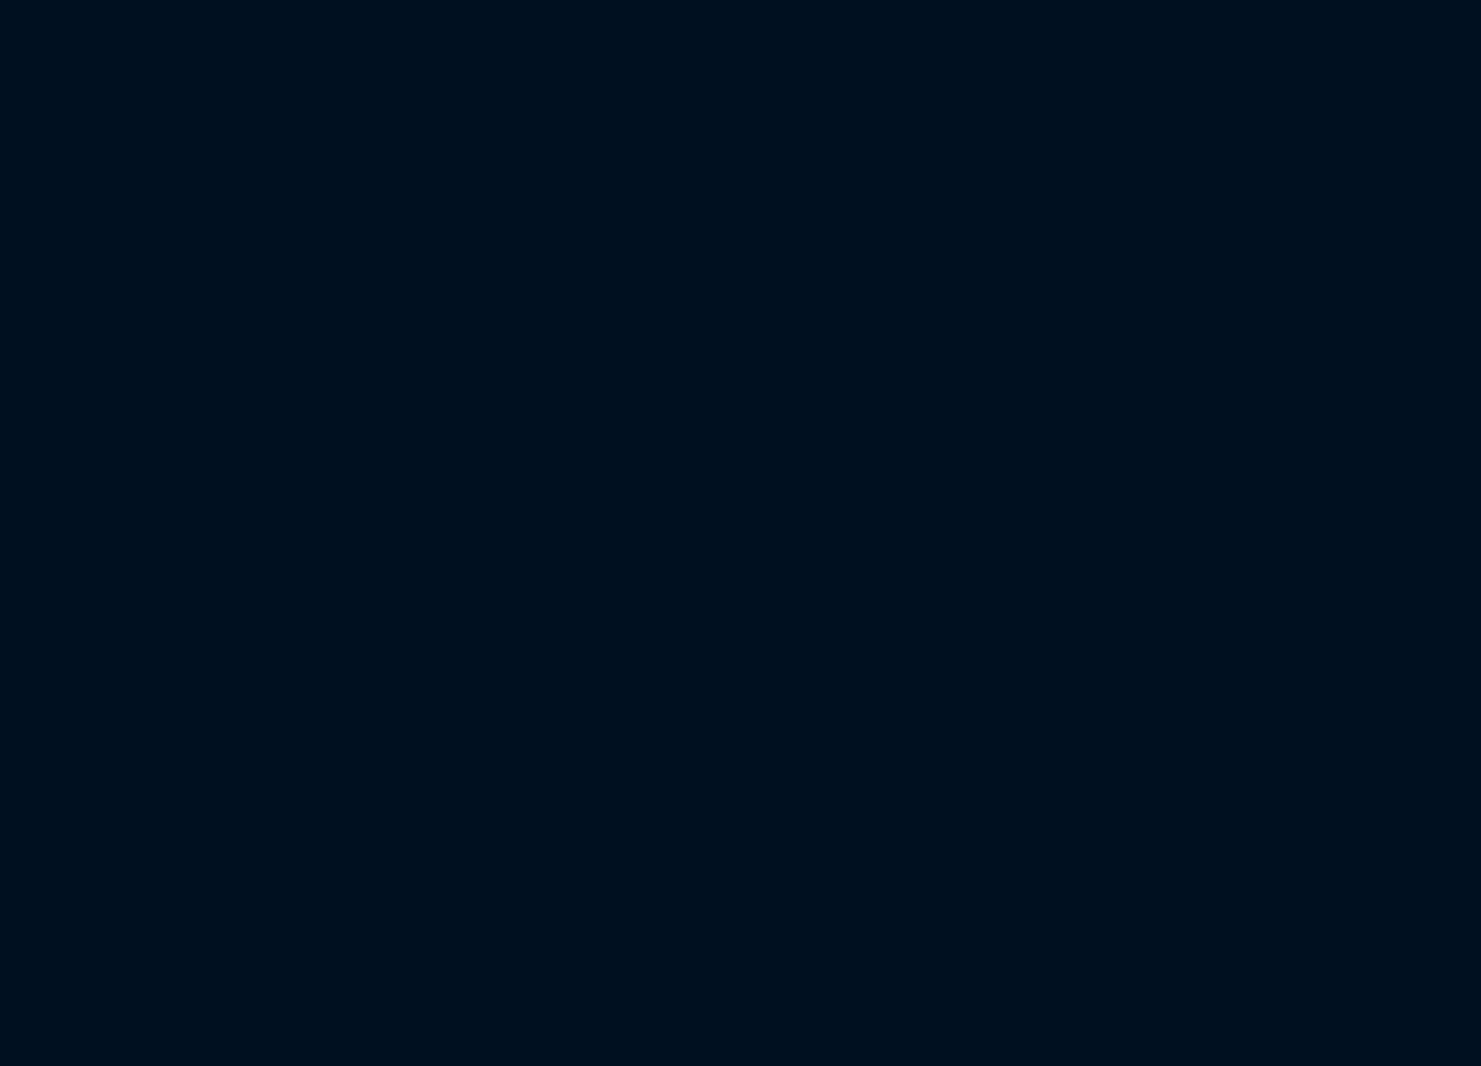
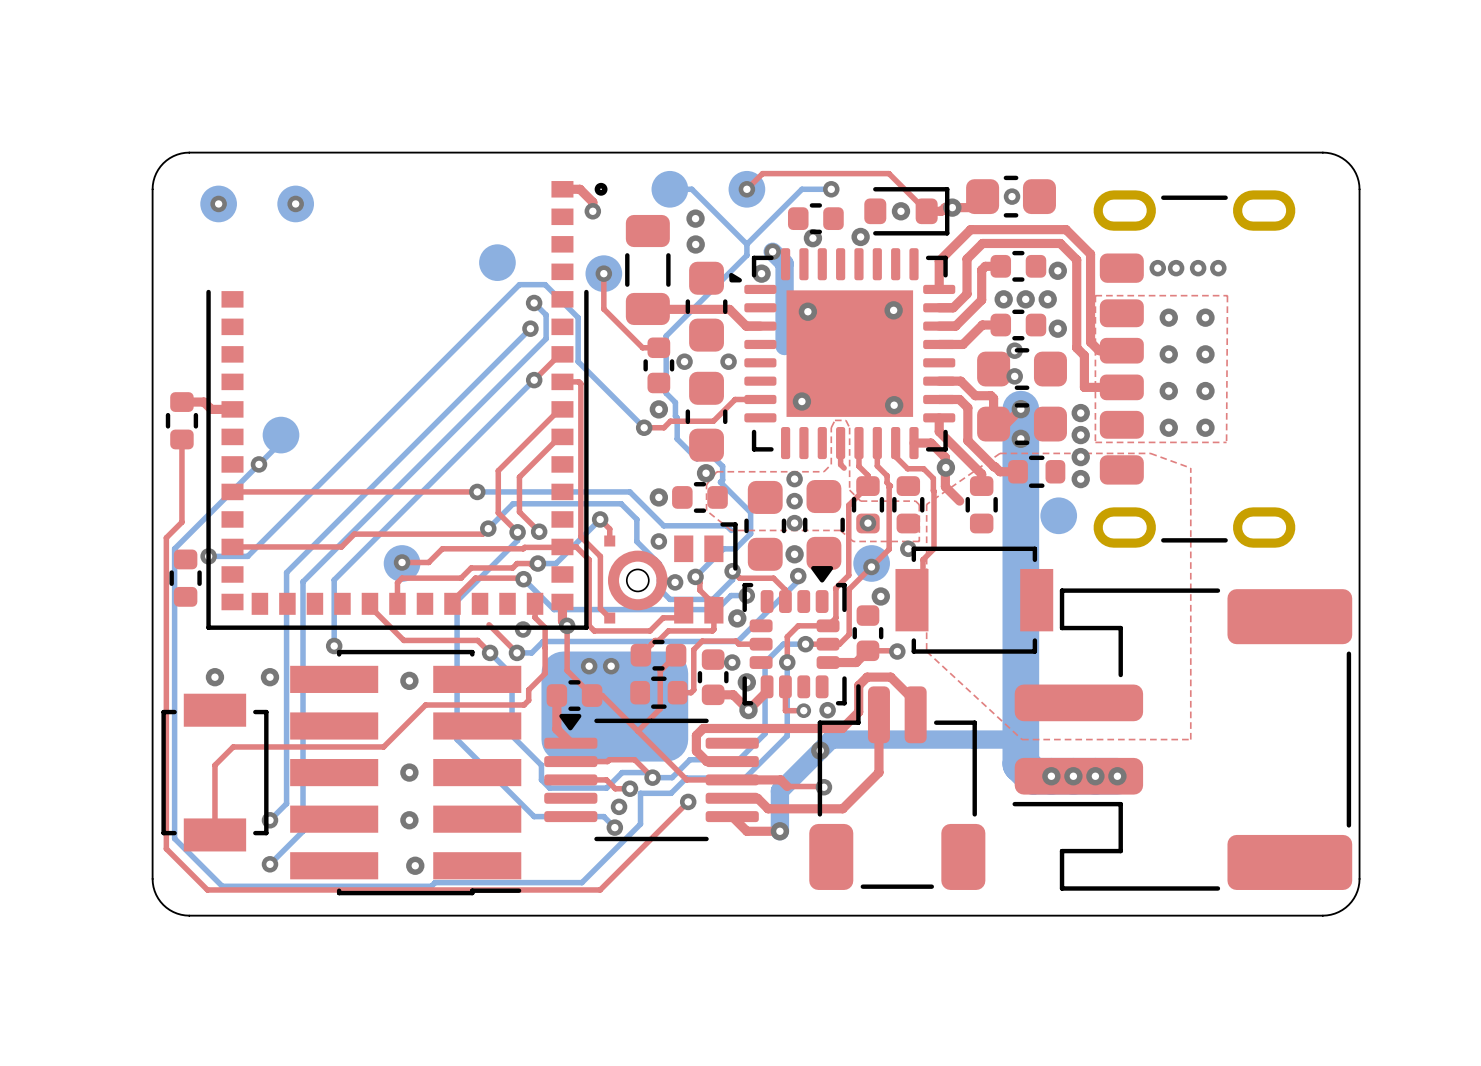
board edge: none -> (189, 152) (1322, 152) (1342, 158) (1355, 173) (1359, 189) (1359, 878) (1353, 898) (1342, 910) (1322, 915) (189, 915) (169, 910) (156, 894) (152, 878) (152, 189) (154, 177) (163, 163) (173, 156) (189, 152)
top track: none -> (562, 189) (579, 189) (592, 202) (592, 211)
bottom track: none -> (669, 189) (691, 189) (746, 244)
part: none -> (669, 189)
top track: none -> (746, 189) (762, 173) (888, 173) (926, 211) (941, 211) (945, 207) (971, 207) (982, 196)
part: none -> (746, 189)
via: none -> (746, 189)
bottom track: none -> (831, 189) (801, 189) (746, 244)
via: none -> (831, 189)
part: none -> (1011, 196)
via: none -> (1012, 196)
part: none -> (218, 203)
via: none -> (218, 203)
part: none -> (295, 203)
via: none -> (295, 203)
via: none -> (952, 207)
via: none -> (592, 211)
via: none -> (900, 211)
part: none -> (906, 211)
via: none -> (695, 218)
part: none -> (815, 218)
via: none -> (860, 236)
via: none -> (812, 238)
via: none -> (695, 244)
bottom track: none -> (746, 244) (746, 255) (666, 336) (666, 393) (675, 402) (677, 439) (697, 458) (699, 456) (712, 456) (722, 466) (722, 480) (720, 482) (750, 512) (750, 533) (735, 548) (723, 548) (695, 576)
bottom track: none -> (772, 251) (784, 263) (784, 346)
via: none -> (772, 251)
part: none -> (497, 262)
part: none -> (1018, 266)
via: none -> (1157, 268)
via: none -> (1176, 268)
via: none -> (1198, 268)
via: none -> (1218, 268)
part: none -> (647, 269)
top track: none -> (1004, 269) (1000, 266) (985, 266) (981, 269) (981, 300) (955, 326) (939, 326)
via: none -> (1057, 270)
top track: none -> (603, 273) (603, 309) (642, 347) (658, 347)
part: none -> (603, 273)
via: none -> (603, 273)
via: none -> (761, 273)
top track: none -> (939, 289) (939, 261) (970, 229) (1066, 229) (1090, 254) (1090, 342) (1099, 350) (1121, 350)
top zone outline: none -> (1095, 295) (1227, 295) (1226, 442) (1095, 442) (1095, 295)
via: none -> (1003, 299)
via: none -> (1025, 299)
via: none -> (1047, 299)
bottom track: none -> (534, 303) (546, 315) (546, 338) (303, 581) (303, 831) (269, 864)
via: none -> (534, 303)
part: none -> (706, 306)
top track: none -> (939, 307) (953, 307) (967, 294) (967, 258) (982, 243) (1060, 243) (1076, 259) (1076, 347) (1084, 355) (1084, 387) (1121, 387)
top track: none -> (652, 309) (729, 309) (746, 326) (760, 326)
via: none -> (893, 310)
via: none -> (807, 311)
via: none -> (1168, 317)
via: none -> (1205, 317)
top track: none -> (1000, 325) (982, 325) (962, 344) (939, 344)
part: none -> (1018, 325)
bottom track: none -> (530, 328) (286, 572) (286, 803) (269, 820)
via: none -> (530, 328)
via: none -> (1057, 328)
via: none -> (1014, 350)
part: none -> (842, 353)
top track: none -> (562, 354) (559, 354) (534, 380)
via: none -> (1168, 354)
via: none -> (1205, 354)
via: none -> (684, 361)
via: none -> (728, 361)
part: none -> (658, 365)
part: none -> (1022, 369)
part: none -> (1194, 369)
via: none -> (1014, 376)
bottom track: none -> (534, 380) (334, 579) (334, 646)
via: none -> (534, 380)
top track: none -> (562, 381) (578, 381) (580, 383) (580, 536) (600, 556) (600, 608) (609, 618)
top track: none -> (939, 381) (960, 381) (975, 395) (990, 395) (993, 398) (993, 424) (1005, 424) (1020, 409)
via: none -> (1168, 391)
via: none -> (1205, 391)
top track: none -> (760, 399) (735, 399) (713, 421) (670, 421) (663, 427) (644, 427)
top track: none -> (939, 399) (959, 399) (967, 407) (967, 440) (1000, 471) (1018, 471)
via: none -> (801, 401)
top track: none -> (181, 402) (203, 402) (211, 409) (232, 409)
part: none -> (406, 405)
via: none -> (894, 405)
top track: none -> (562, 409) (559, 409) (498, 470) (498, 512) (517, 532)
via: none -> (658, 409)
bottom track: none -> (1020, 409) (1020, 764) (1033, 776) (1117, 776)
via: none -> (1020, 409)
via: none -> (1080, 413)
part: none -> (706, 416)
top track: none -> (939, 417) (939, 431) (981, 474) (981, 486)
part: none -> (181, 420)
top zone outline: none -> (834, 420) (831, 427) (831, 464) (823, 471) (716, 471) (706, 484) (706, 510) (731, 530) (840, 530) (853, 541) (919, 541) (919, 504) (915, 501) (860, 501) (849, 490) (849, 427) (845, 420) (834, 420)
part: none -> (1022, 424)
bottom track: none -> (644, 427) (578, 361) (578, 317) (545, 284) (519, 284) (247, 556) (208, 556)
via: none -> (644, 427)
via: none -> (1168, 427)
via: none -> (1205, 427)
bottom track: none -> (281, 435) (281, 442) (174, 548) (174, 838) (222, 886) (431, 886) (435, 882) (581, 882) (640, 824) (640, 793) (671, 793) (686, 778) (745, 778) (787, 735) (787, 662)
part: none -> (281, 435)
via: none -> (1080, 435)
top track: none -> (562, 436) (559, 436) (519, 477) (519, 512) (539, 531)
via: none -> (1020, 438)
top track: none -> (181, 439) (181, 522) (166, 537) (166, 848) (207, 889) (600, 889) (688, 801)
top track: none -> (840, 443) (840, 464) (844, 468)
top track: none -> (858, 443) (858, 466) (867, 475) (867, 486) (848, 505) (848, 575) (835, 588)
top track: none -> (877, 443) (877, 466) (887, 475) (887, 482) (890, 486) (889, 549) (849, 589) (849, 634) (839, 644) (805, 644)
top track: none -> (895, 443) (895, 456) (907, 468) (923, 468) (933, 478) (933, 548) (922, 559) (922, 600)
top track: none -> (914, 443) (930, 443) (945, 457) (945, 486) (959, 501)
top zone outline: none -> (1000, 453) (926, 504) (926, 651) (1022, 739) (1190, 739) (1190, 468) (1150, 453) (1000, 453)
via: none -> (1080, 457)
via: none -> (258, 464)
via: none -> (945, 467)
part: none -> (1036, 471)
via: none -> (706, 473)
via: none -> (794, 479)
via: none -> (1080, 479)
top track: none -> (479, 490) (477, 491) (232, 491)
bottom track: none -> (477, 491) (629, 491) (663, 525) (726, 525) (731, 530)
via: none -> (477, 491)
via: none -> (658, 497)
part: none -> (699, 497)
via: none -> (794, 501)
part: none -> (867, 504)
part: none -> (908, 504)
part: none -> (981, 504)
part: none -> (1058, 515)
top track: none -> (600, 519) (609, 529) (609, 541)
bottom track: none -> (600, 519) (556, 563) (537, 563)
via: none -> (600, 519)
via: none -> (794, 523)
via: none -> (867, 523)
part: none -> (823, 524)
part: none -> (765, 525)
top track: none -> (488, 528) (482, 534) (354, 534) (341, 546) (232, 546)
bottom track: none -> (488, 528) (513, 503) (621, 503) (636, 519) (636, 541) (659, 564) (659, 588) (669, 599) (712, 599) (732, 579) (732, 571)
via: none -> (488, 528)
via: none -> (539, 531)
bottom track: none -> (517, 532) (517, 540) (457, 601) (457, 739) (534, 816) (603, 816) (614, 827)
via: none -> (517, 532)
via: none -> (658, 541)
top track: none -> (562, 546) (576, 546) (589, 559) (589, 625) (594, 630) (650, 630) (663, 617) (676, 617) (683, 610)
top track: none -> (562, 547) (442, 548) (428, 562) (402, 562)
via: none -> (908, 548)
via: none -> (794, 554)
via: none -> (208, 556)
via: none -> (402, 562)
part: none -> (402, 563)
top track: none -> (537, 563) (533, 567) (530, 563) (517, 563) (512, 567) (471, 567) (461, 578) (402, 578) (397, 582) (397, 603)
via: none -> (537, 563)
part: none -> (871, 563)
via: none -> (871, 566)
top track: none -> (732, 571) (739, 578) (773, 578) (785, 590) (785, 601)
via: none -> (732, 571)
part: none -> (670, 572)
top track: none -> (695, 576) (699, 582) (699, 590) (709, 599) (713, 600) (713, 629) (668, 630) (658, 640) (655, 640) (640, 655)
via: none -> (695, 576)
bottom track: none -> (798, 576) (798, 580) (737, 641) (543, 641) (531, 652) (516, 652)
via: none -> (798, 576)
part: none -> (185, 578)
top track: none -> (523, 578) (475, 578) (452, 601) (452, 603)
bottom track: none -> (523, 579) (554, 609) (717, 609) (731, 595) (746, 595)
via: none -> (523, 579)
via: none -> (675, 582)
top track: none -> (835, 588) (835, 617) (828, 625) (798, 625) (787, 636) (787, 662)
via: none -> (746, 595)
via: none -> (880, 596)
part: none -> (974, 600)
top track: none -> (562, 601) (562, 621) (567, 625) (567, 670) (592, 695) (602, 695) (686, 779) (780, 779) (787, 786) (823, 787)
top track: none -> (369, 603) (369, 606) (403, 640) (477, 640) (490, 652)
top track: none -> (535, 603) (535, 617) (545, 627) (545, 673) (528, 689) (528, 700) (524, 705) (425, 705) (383, 746) (233, 746) (214, 765) (214, 834)
via: none -> (737, 618)
top track: none -> (489, 624) (516, 652)
via: none -> (567, 625)
via: none -> (523, 629)
part: none -> (867, 633)
part: none -> (794, 635)
top track: none -> (761, 644) (738, 644) (735, 641) (702, 641) (693, 649) (693, 689) (691, 692) (677, 692)
bottom track: none -> (805, 644) (783, 644) (765, 662) (765, 733) (739, 759) (690, 759) (672, 777) (652, 777) (647, 772) (622, 772) (606, 788) (549, 788) (541, 779) (541, 765) (512, 735) (512, 674) (490, 652)
via: none -> (805, 644)
via: none -> (334, 646)
top track: none -> (897, 651) (867, 650) (856, 662) (828, 662)
via: none -> (897, 651)
via: none -> (490, 652)
via: none -> (516, 652)
part: none -> (658, 655)
top track: none -> (676, 655) (660, 671) (660, 708) (637, 731)
via: none -> (732, 662)
via: none -> (787, 662)
via: none -> (589, 666)
via: none -> (611, 666)
via: none -> (214, 677)
via: none -> (269, 677)
part: none -> (713, 677)
via: none -> (409, 680)
via: none -> (746, 682)
top track: none -> (767, 686) (767, 691) (748, 710) (733, 694) (713, 694)
top track: none -> (785, 686) (785, 710) (803, 710)
part: none -> (658, 692)
top track: none -> (556, 695) (556, 729) (570, 743)
part: none -> (574, 695)
part: none -> (614, 706)
via: none -> (748, 710)
via: none -> (803, 710)
via: none -> (827, 710)
top track: none -> (878, 714) (878, 772) (842, 808) (768, 808) (757, 798) (732, 798)
top track: none -> (915, 714) (915, 702) (890, 677) (867, 677) (858, 685) (858, 712) (842, 728) (703, 728) (696, 735) (696, 751) (706, 761) (732, 761)
bottom track: none -> (1020, 739) (831, 739) (779, 790) (779, 831)
part: none -> (1182, 739)
via: none -> (820, 750)
top track: none -> (570, 761) (634, 759) (652, 777)
part: none -> (214, 772)
part: none -> (405, 772)
via: none -> (409, 772)
via: none -> (1051, 776)
via: none -> (1073, 776)
via: none -> (1095, 776)
via: none -> (1117, 776)
part: none -> (651, 777)
via: none -> (652, 777)
top track: none -> (570, 779) (606, 779) (615, 788) (629, 788)
via: none -> (823, 787)
part: none -> (897, 787)
via: none -> (629, 788)
via: none -> (688, 801)
via: none -> (619, 806)
top track: none -> (732, 816) (746, 831) (779, 831)
via: none -> (269, 820)
via: none -> (409, 820)
via: none -> (614, 827)
via: none -> (779, 831)
via: none -> (269, 864)
via: none -> (415, 865)

